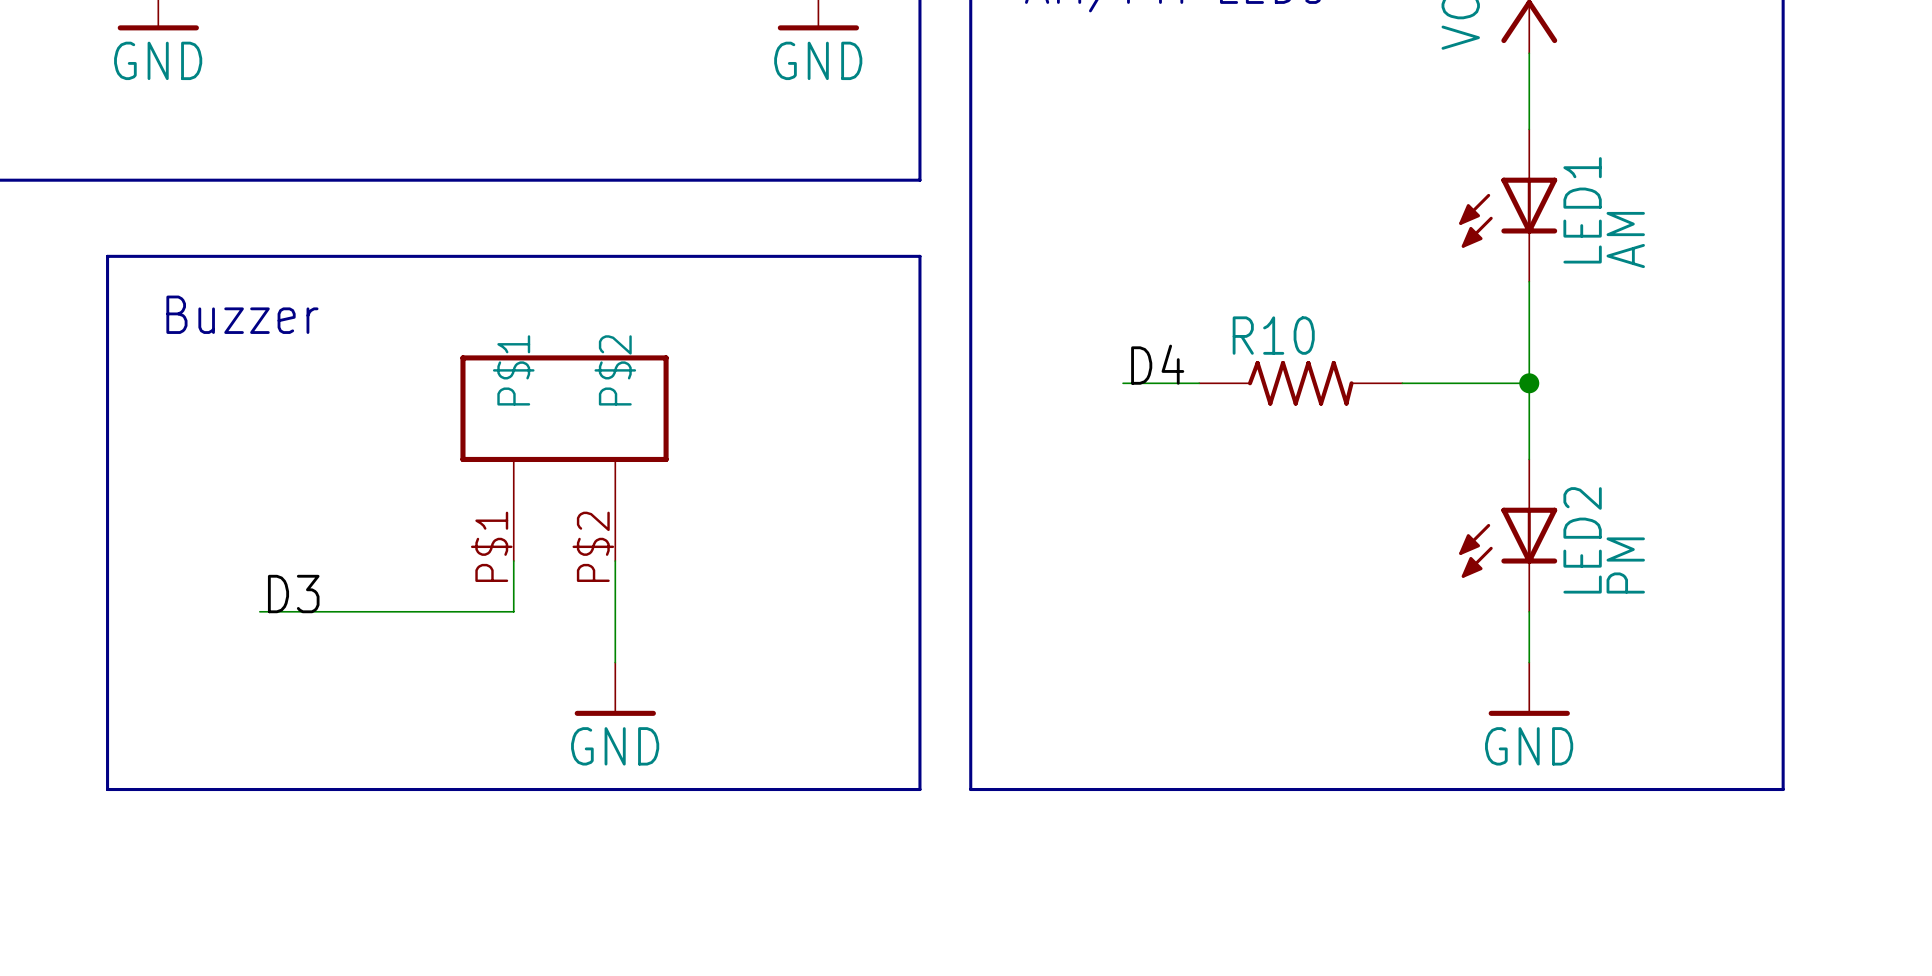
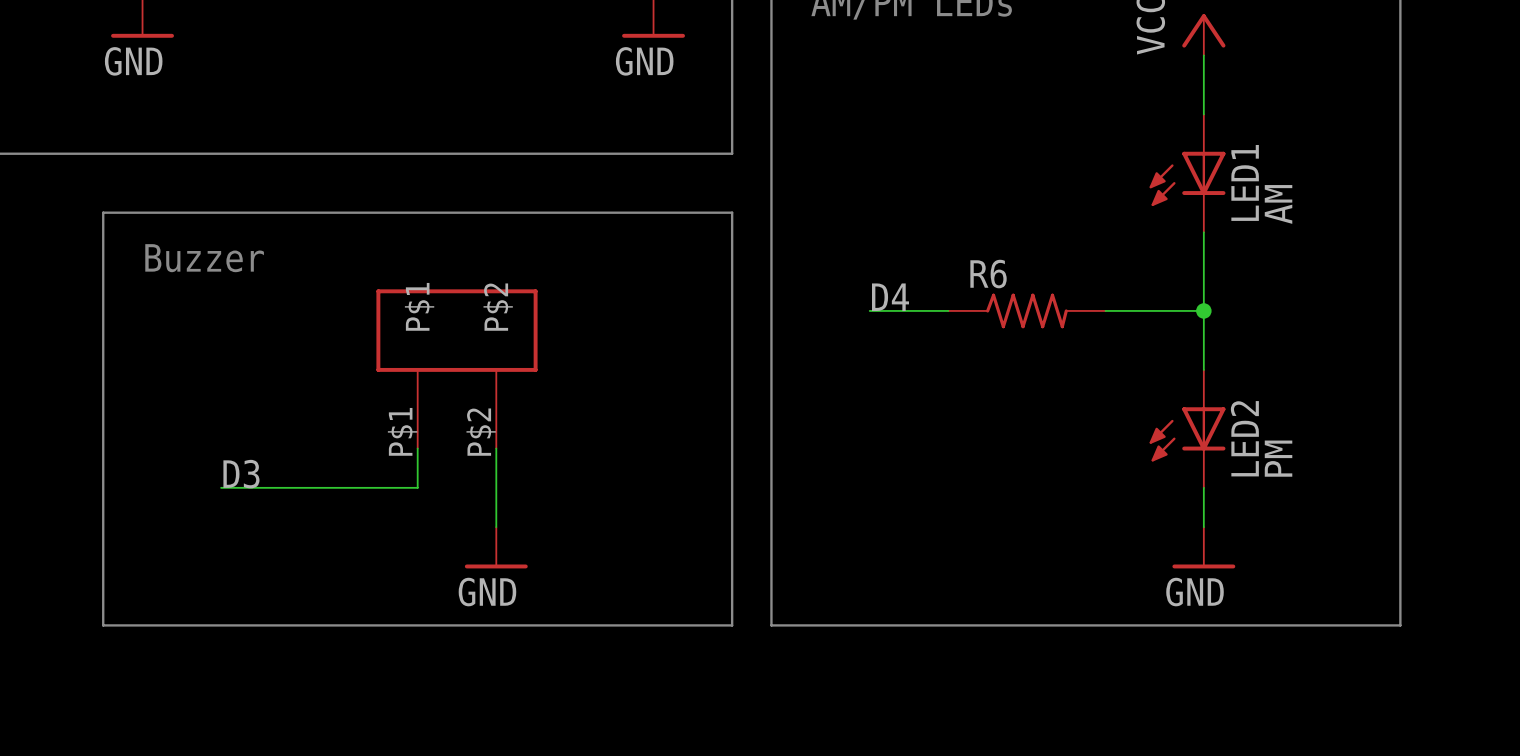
R10 name: R10 (1273, 335) -> R6 (988, 274)
text: none -> D4 (890, 297)
label: D4 (1157, 364) -> none
wire: none -> (869, 310) (889, 310)

